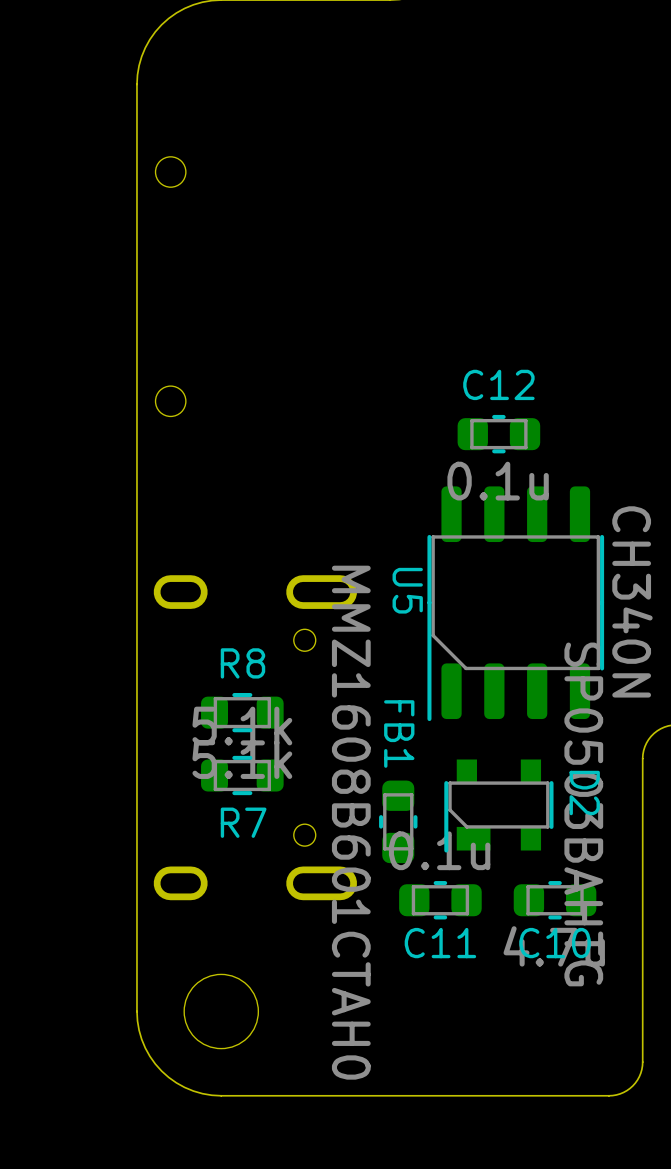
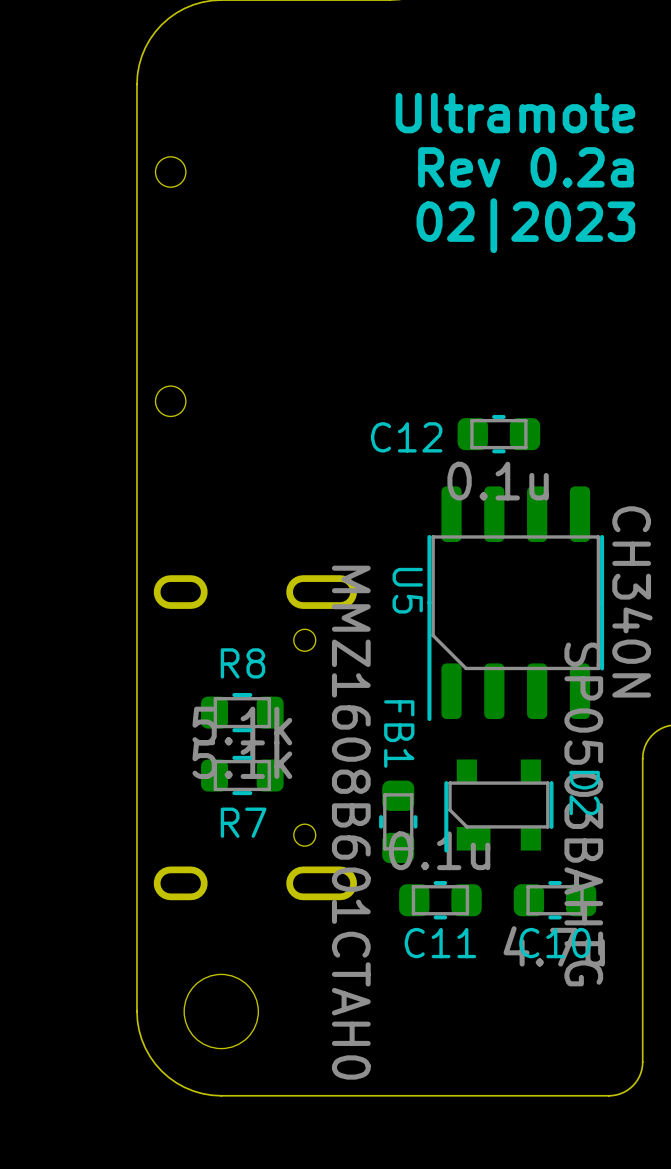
text: none -> Ultramote (515, 113)
text: none -> Rev 0.2a (525, 167)
text: none -> 02|2023 (525, 225)
C12 name position: C12 (498, 384) -> C12 (406, 437)

